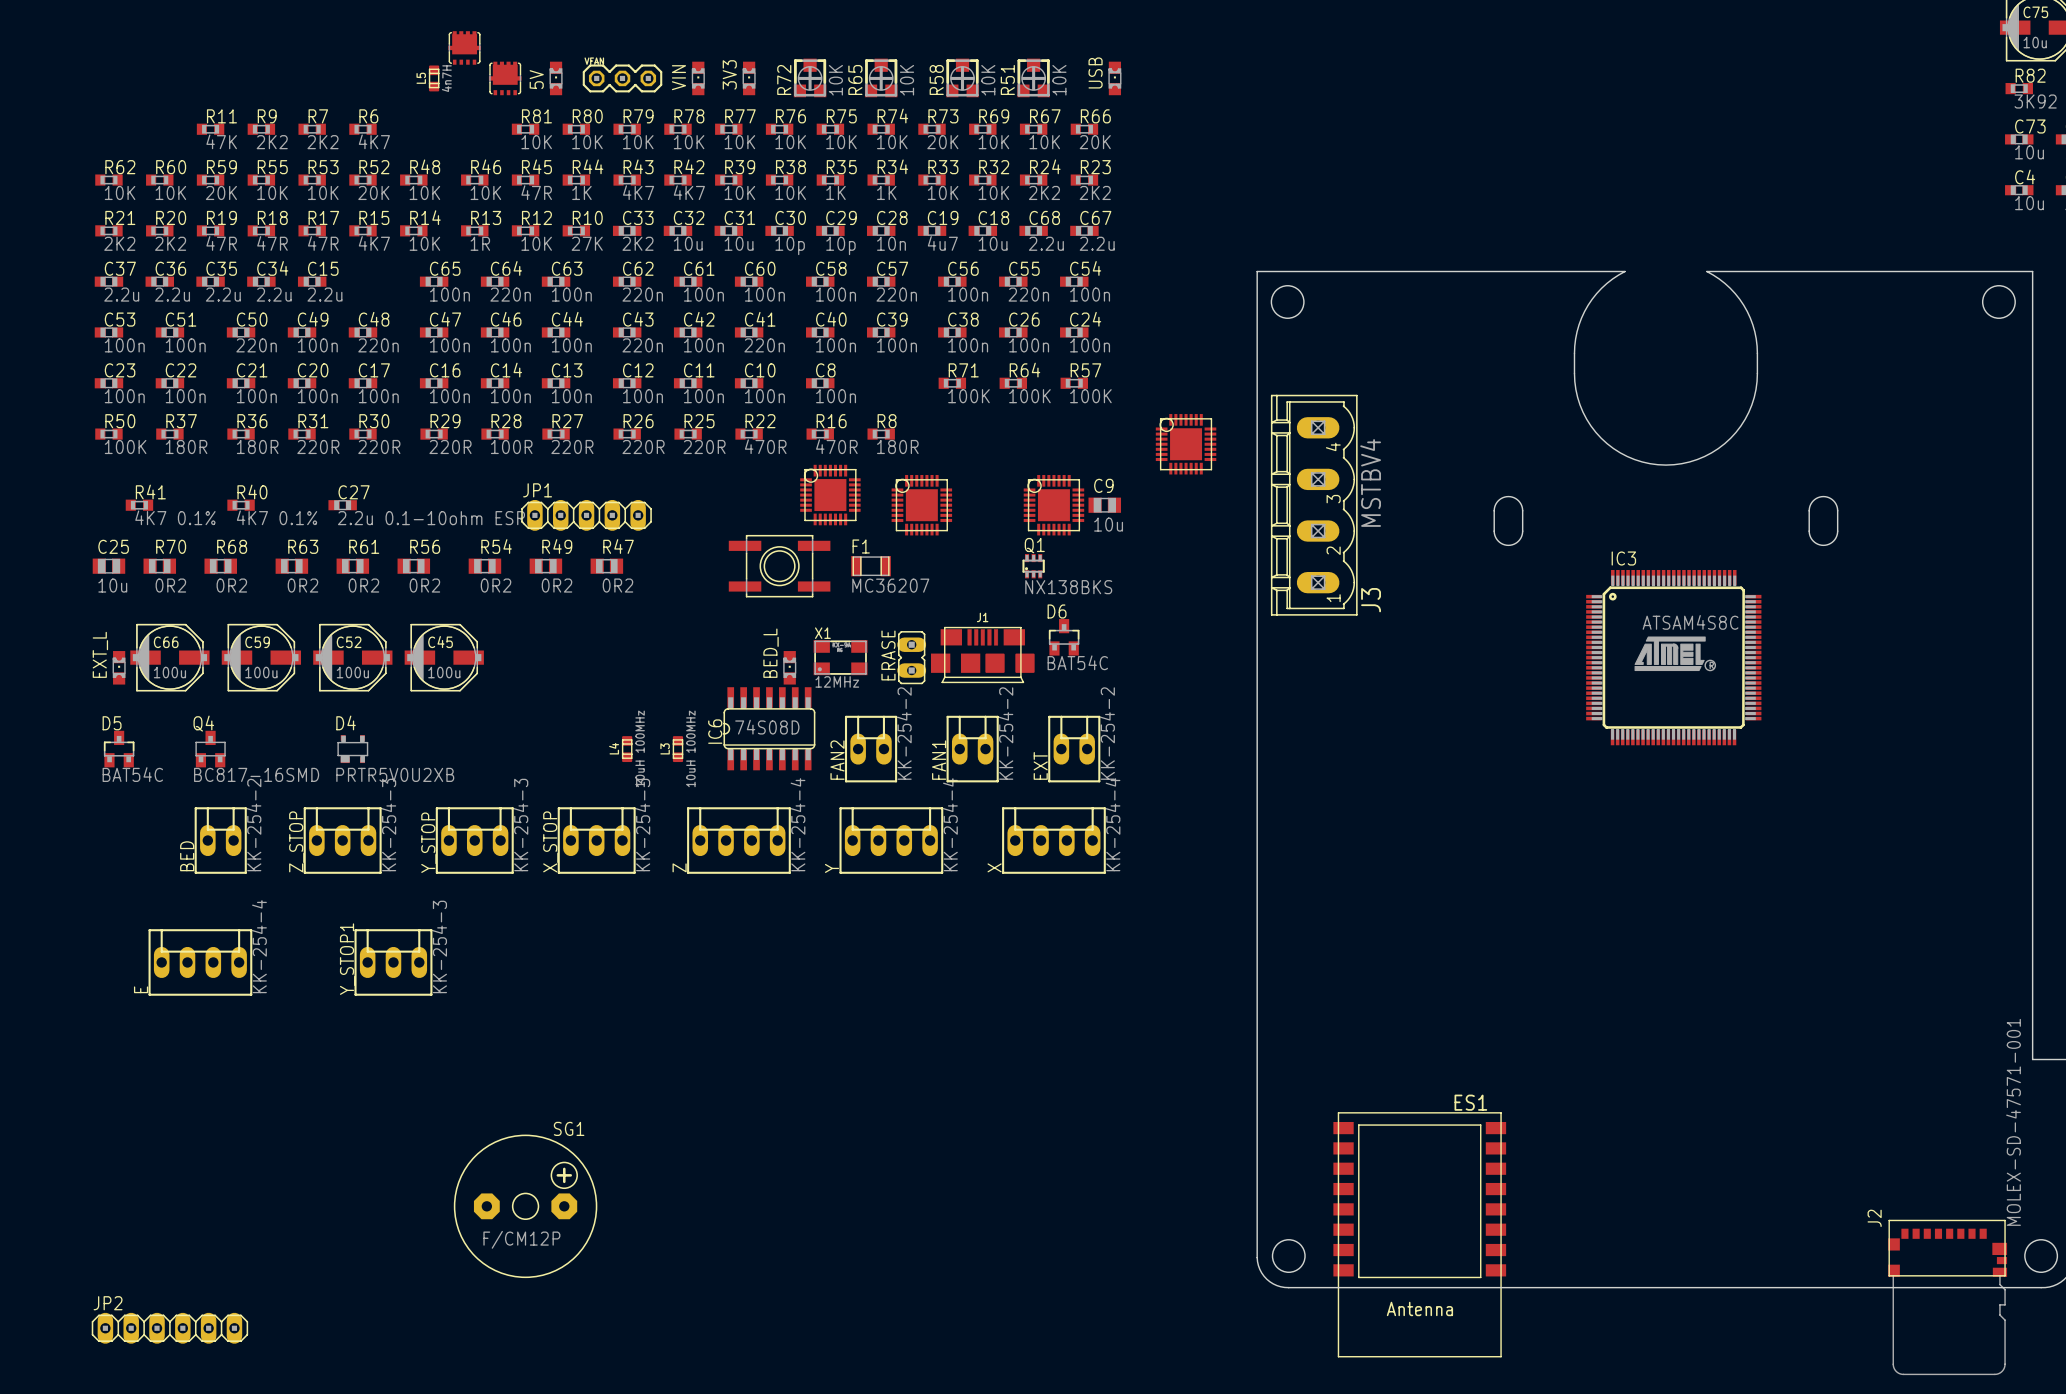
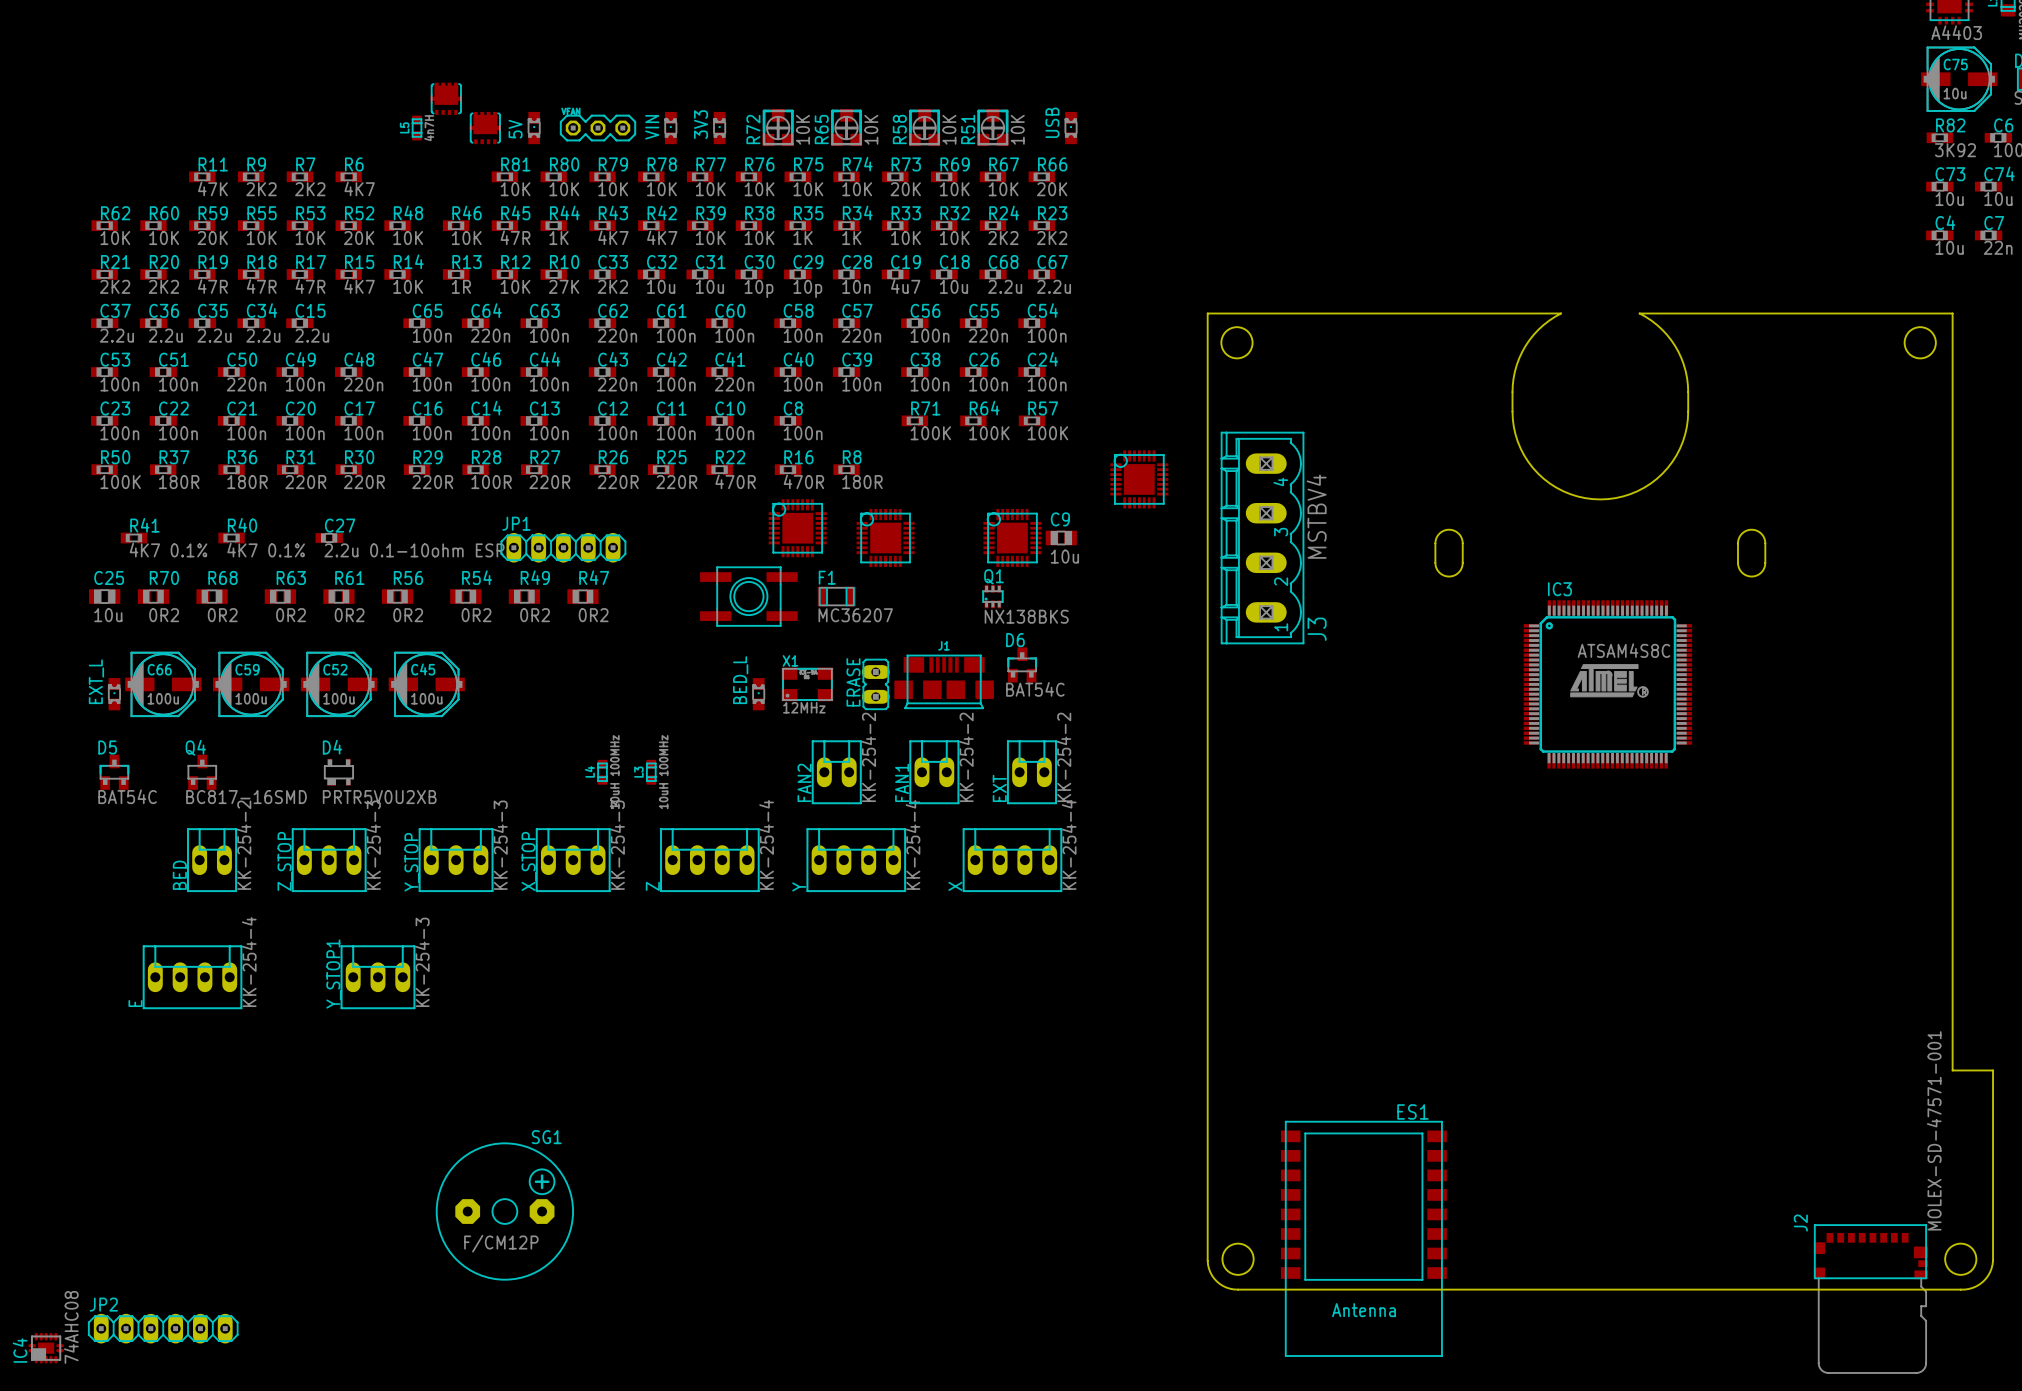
IC6: 74S08D (769, 728) -> none
IC4: none -> 74AHC08 (46, 1348)

